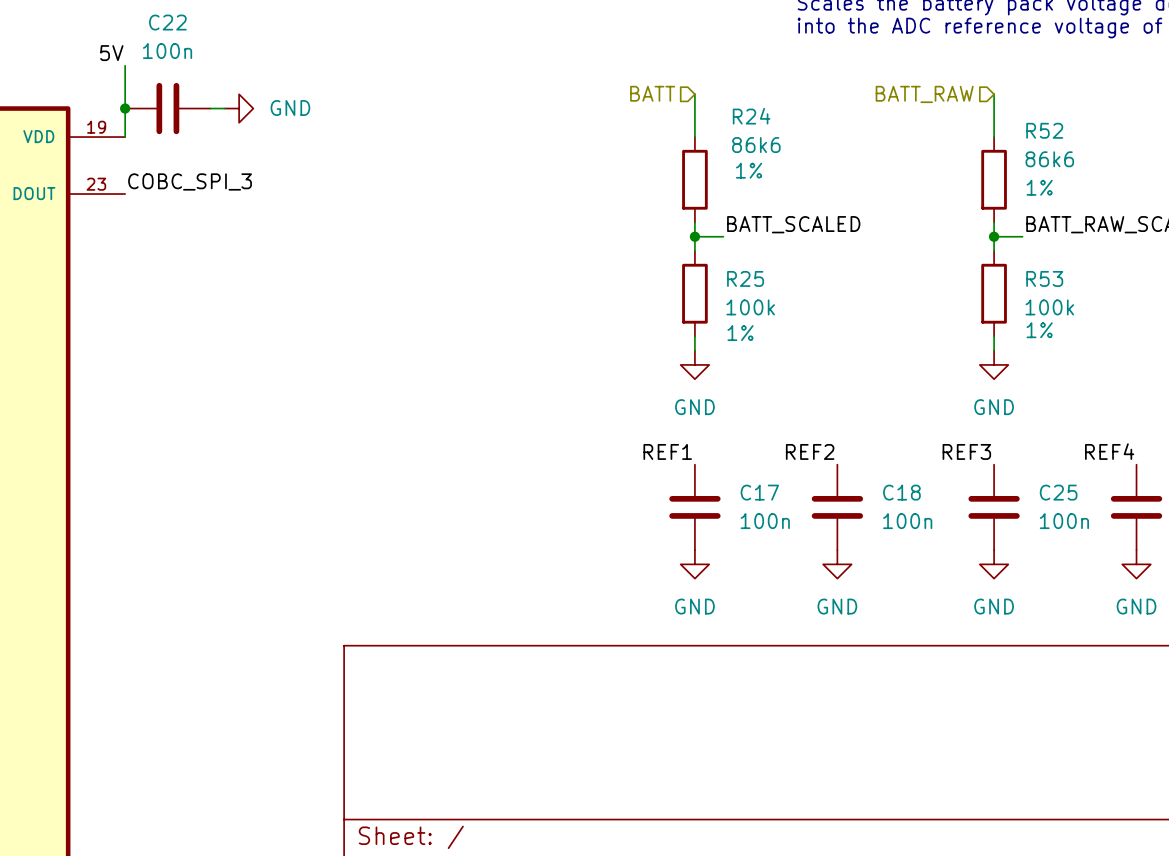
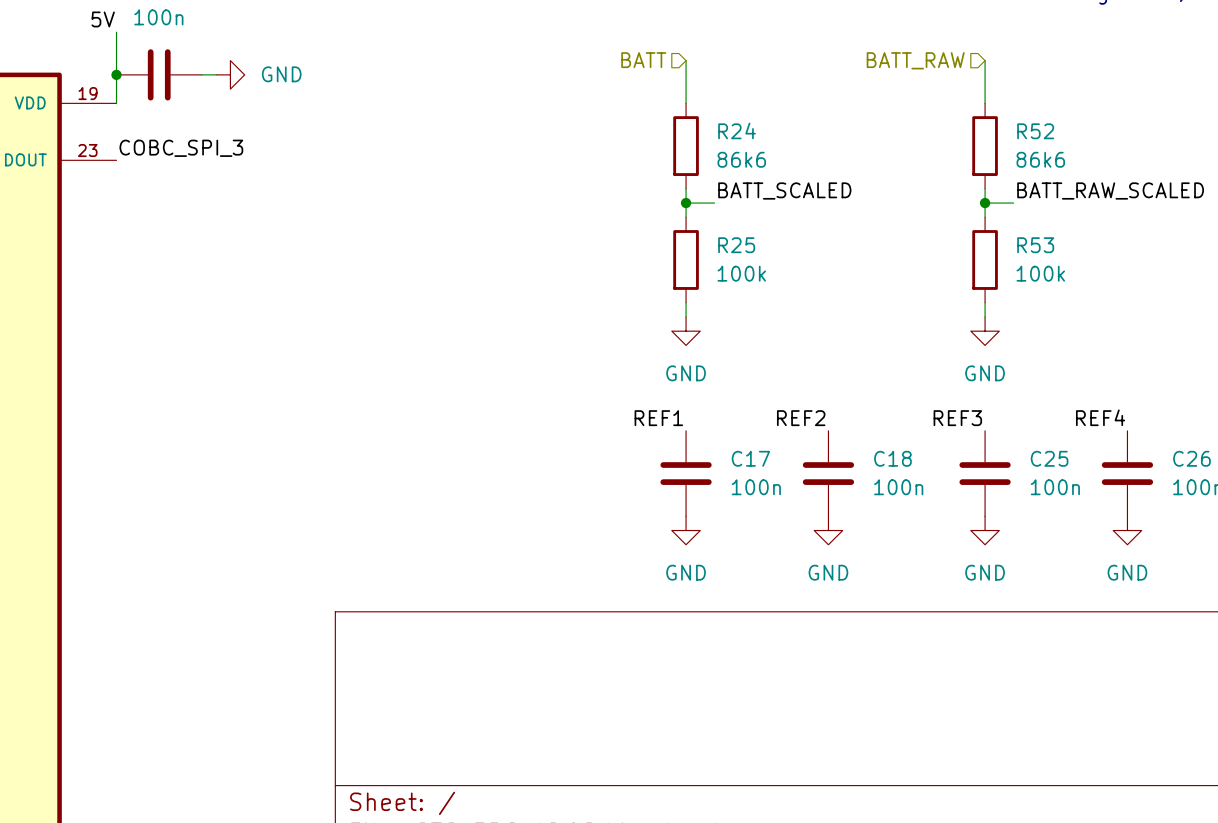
R24 name position: R24 (751, 116) -> R24 (737, 130)
R52 name position: R52 (1044, 130) -> R52 (1035, 131)
R24 value position: 86k6 (756, 145) -> 86k6 (741, 159)
R52 value position: 86k6 (1049, 159) -> 86k6 (1040, 159)
R24 text: 1% (749, 170) -> none
R52 text: 1% (1039, 187) -> none
R53 text: 1% (1039, 330) -> none
R25 text: 1% (740, 333) -> none

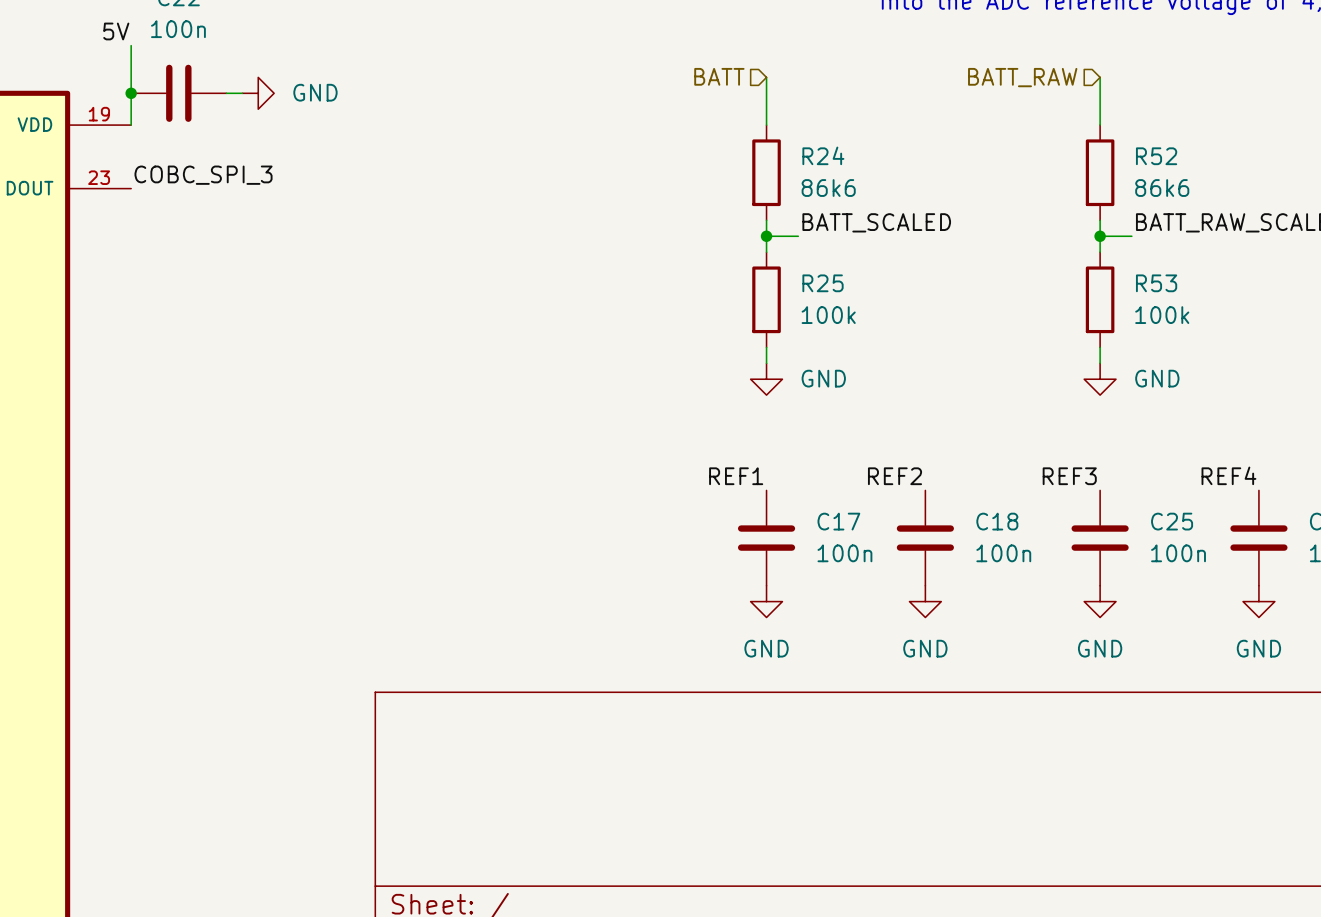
power symbol text position: GND (686, 373) -> GND (823, 378)
power symbol text position: GND (985, 373) -> GND (1157, 378)

